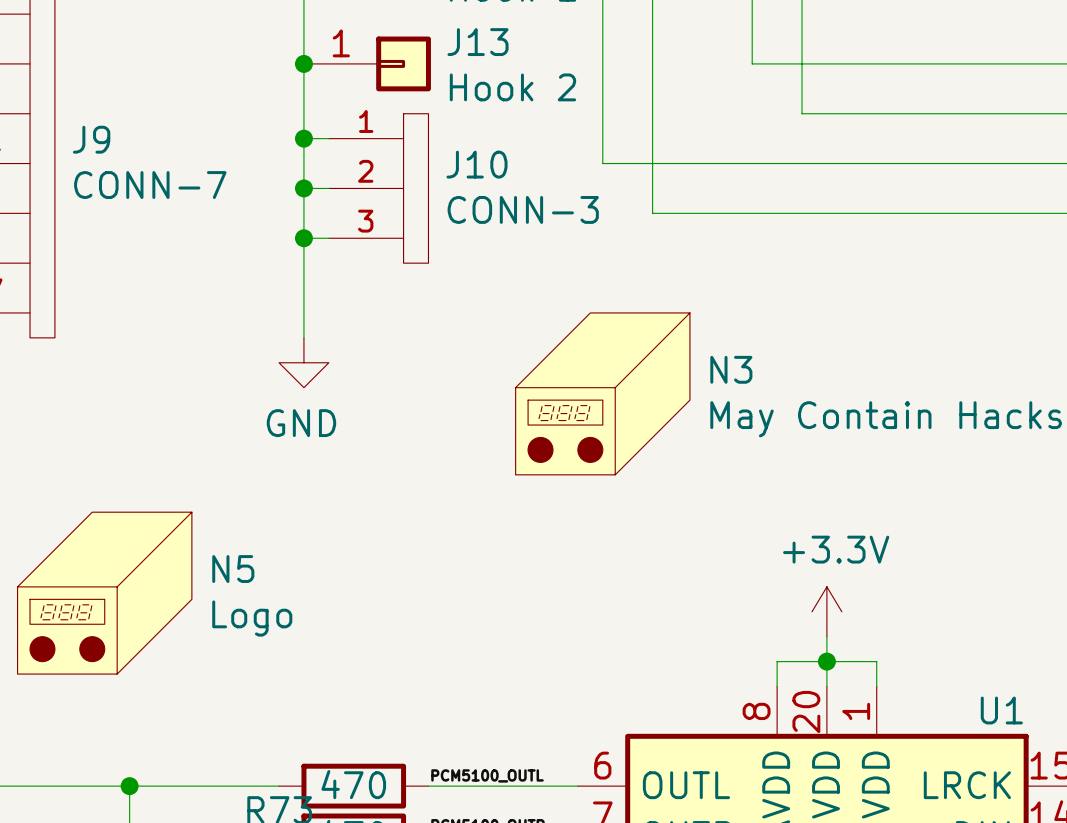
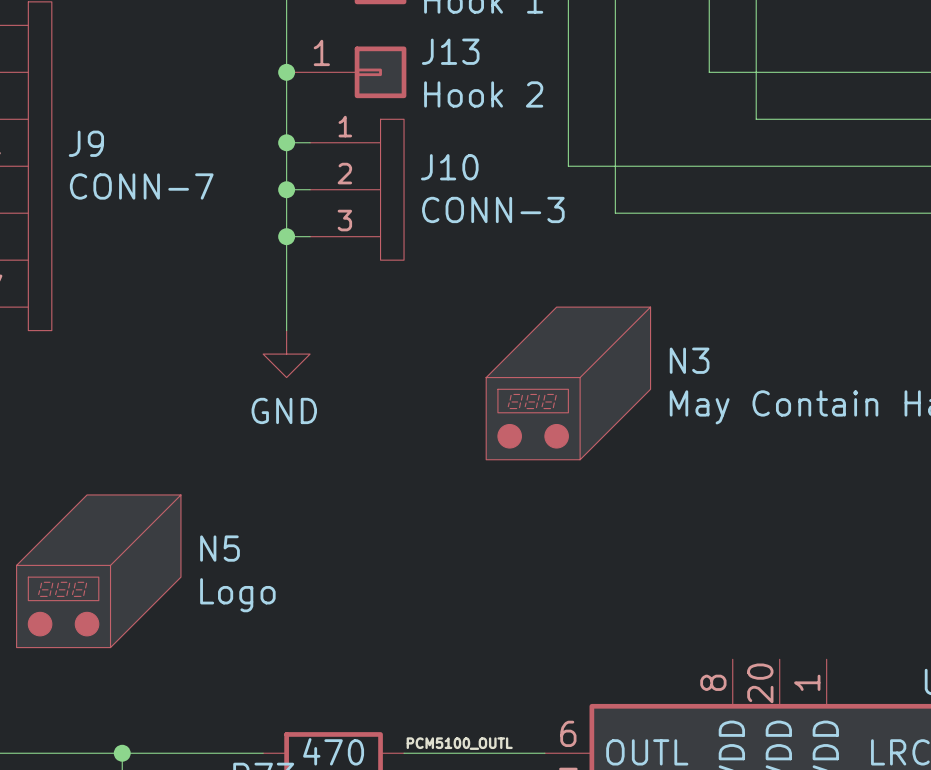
power symbol: +3.3V (826, 611) -> none
wire: (826, 636) (826, 686) -> none
junction: (826, 661) -> none
wire: (777, 686) (777, 661) (876, 661) (876, 686) -> none

